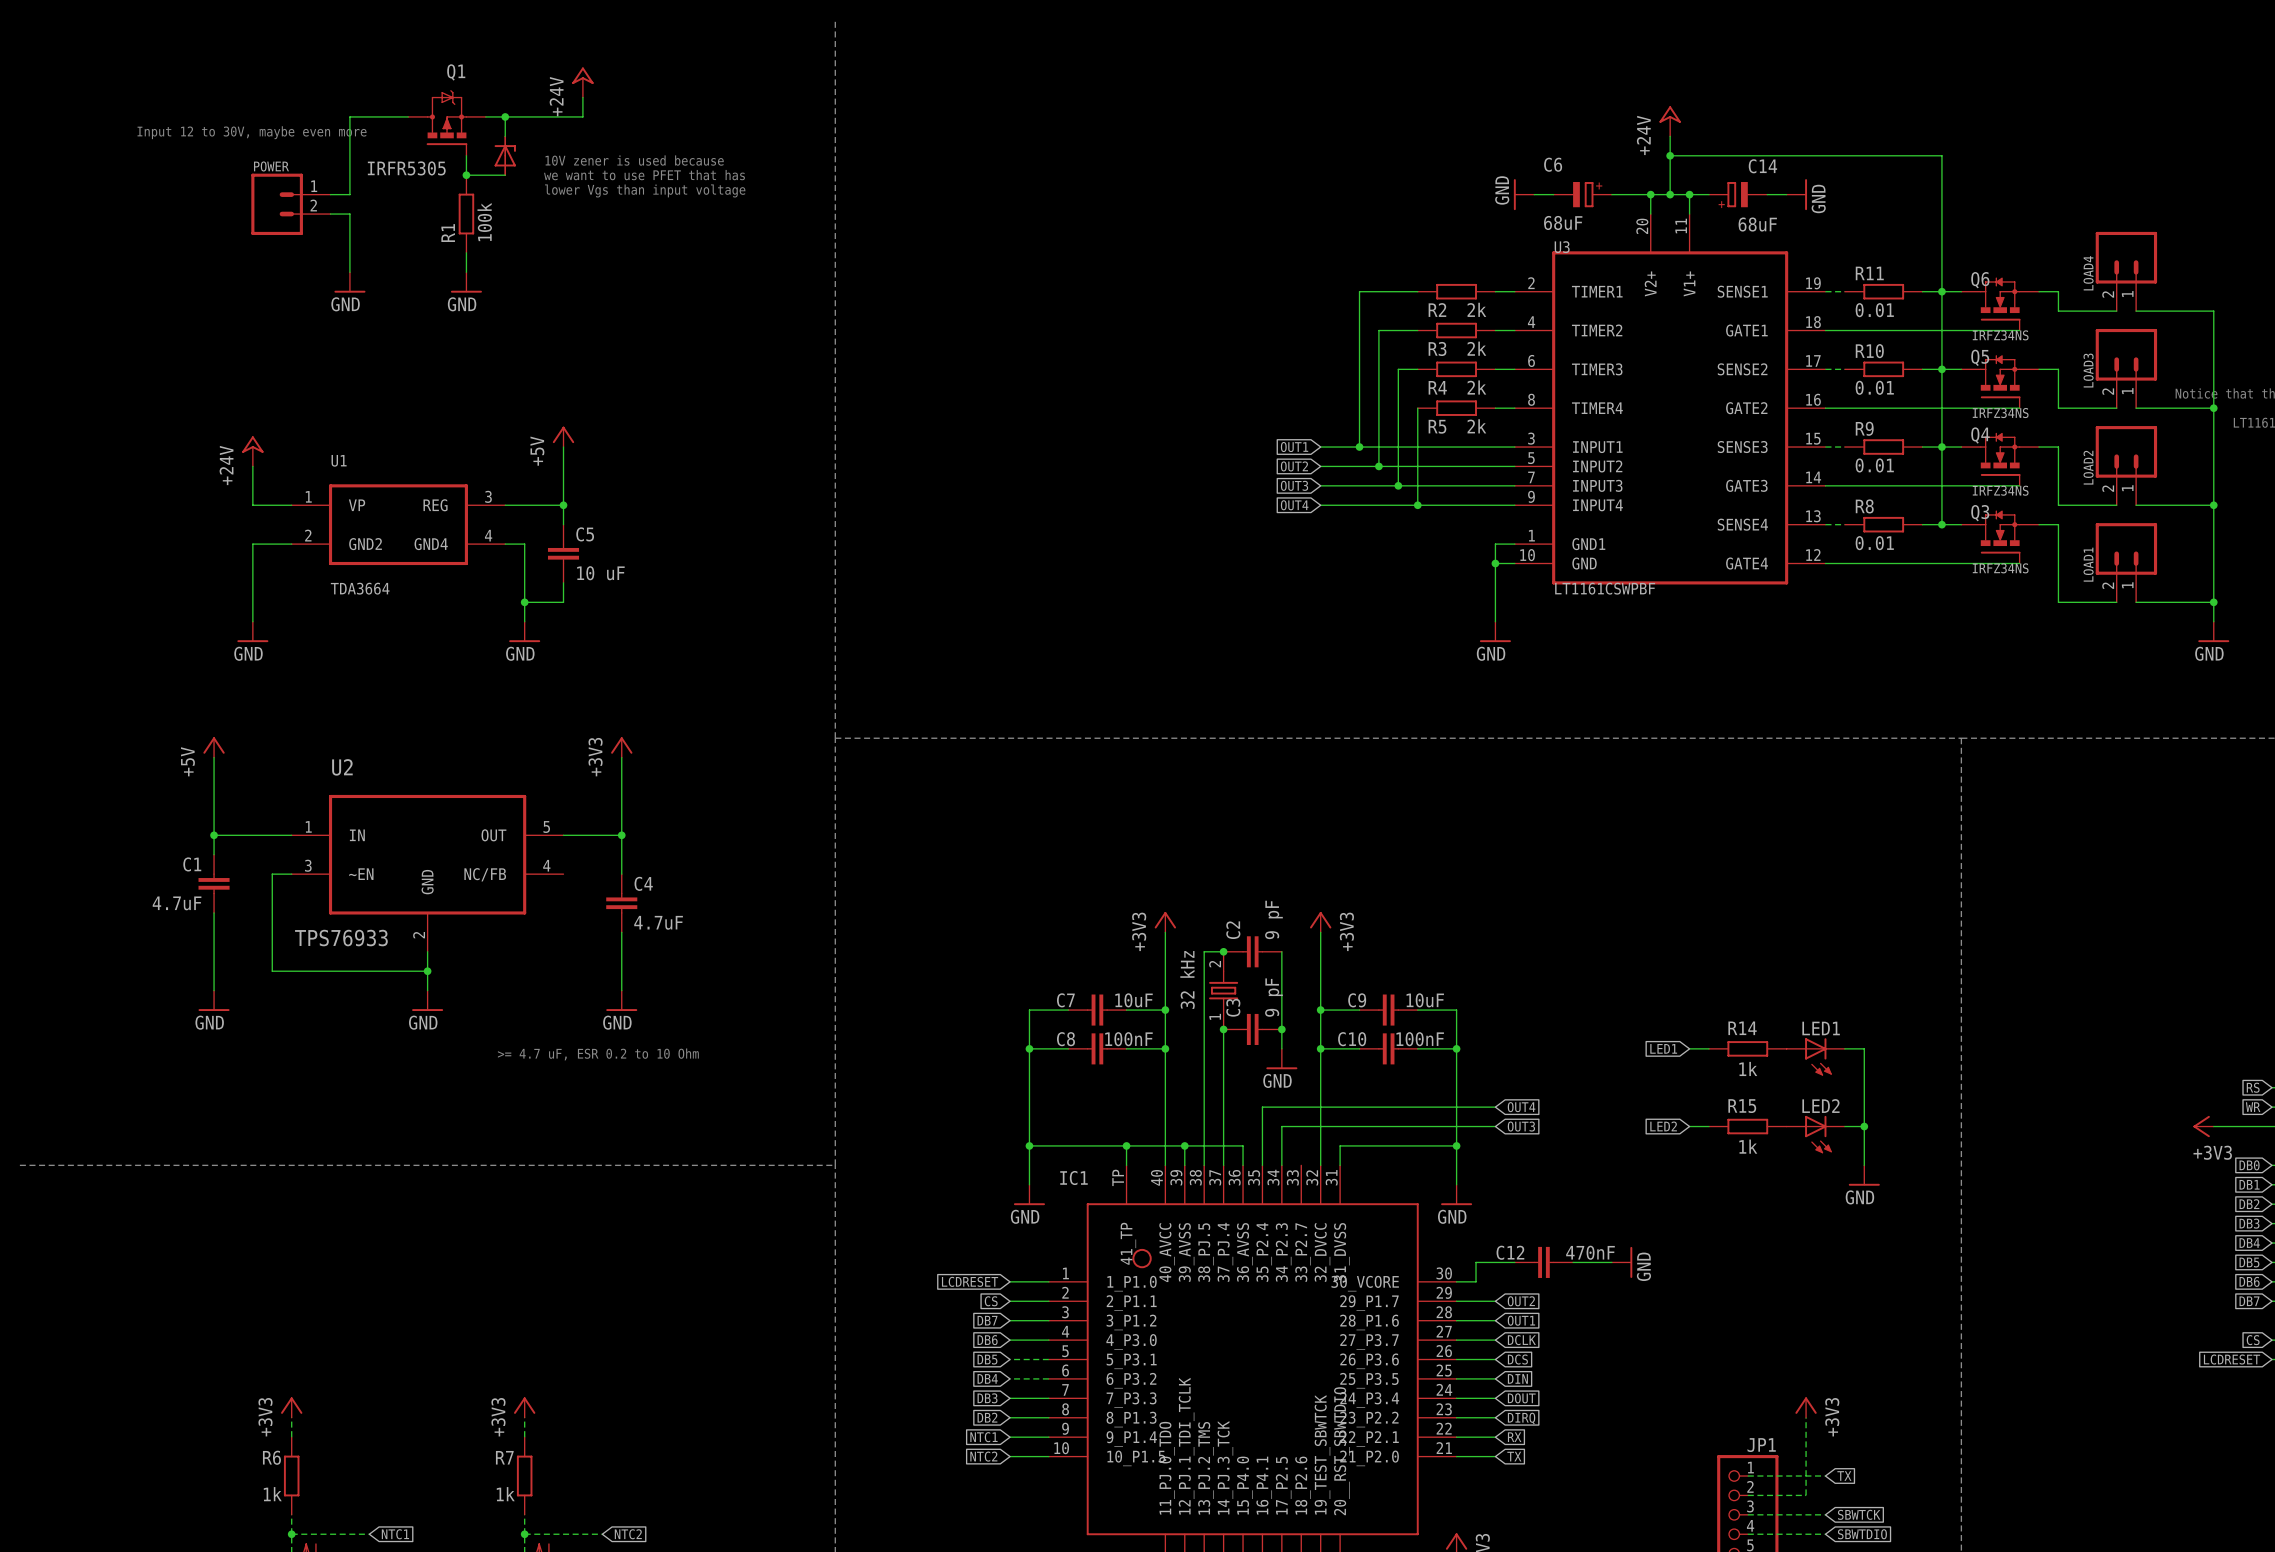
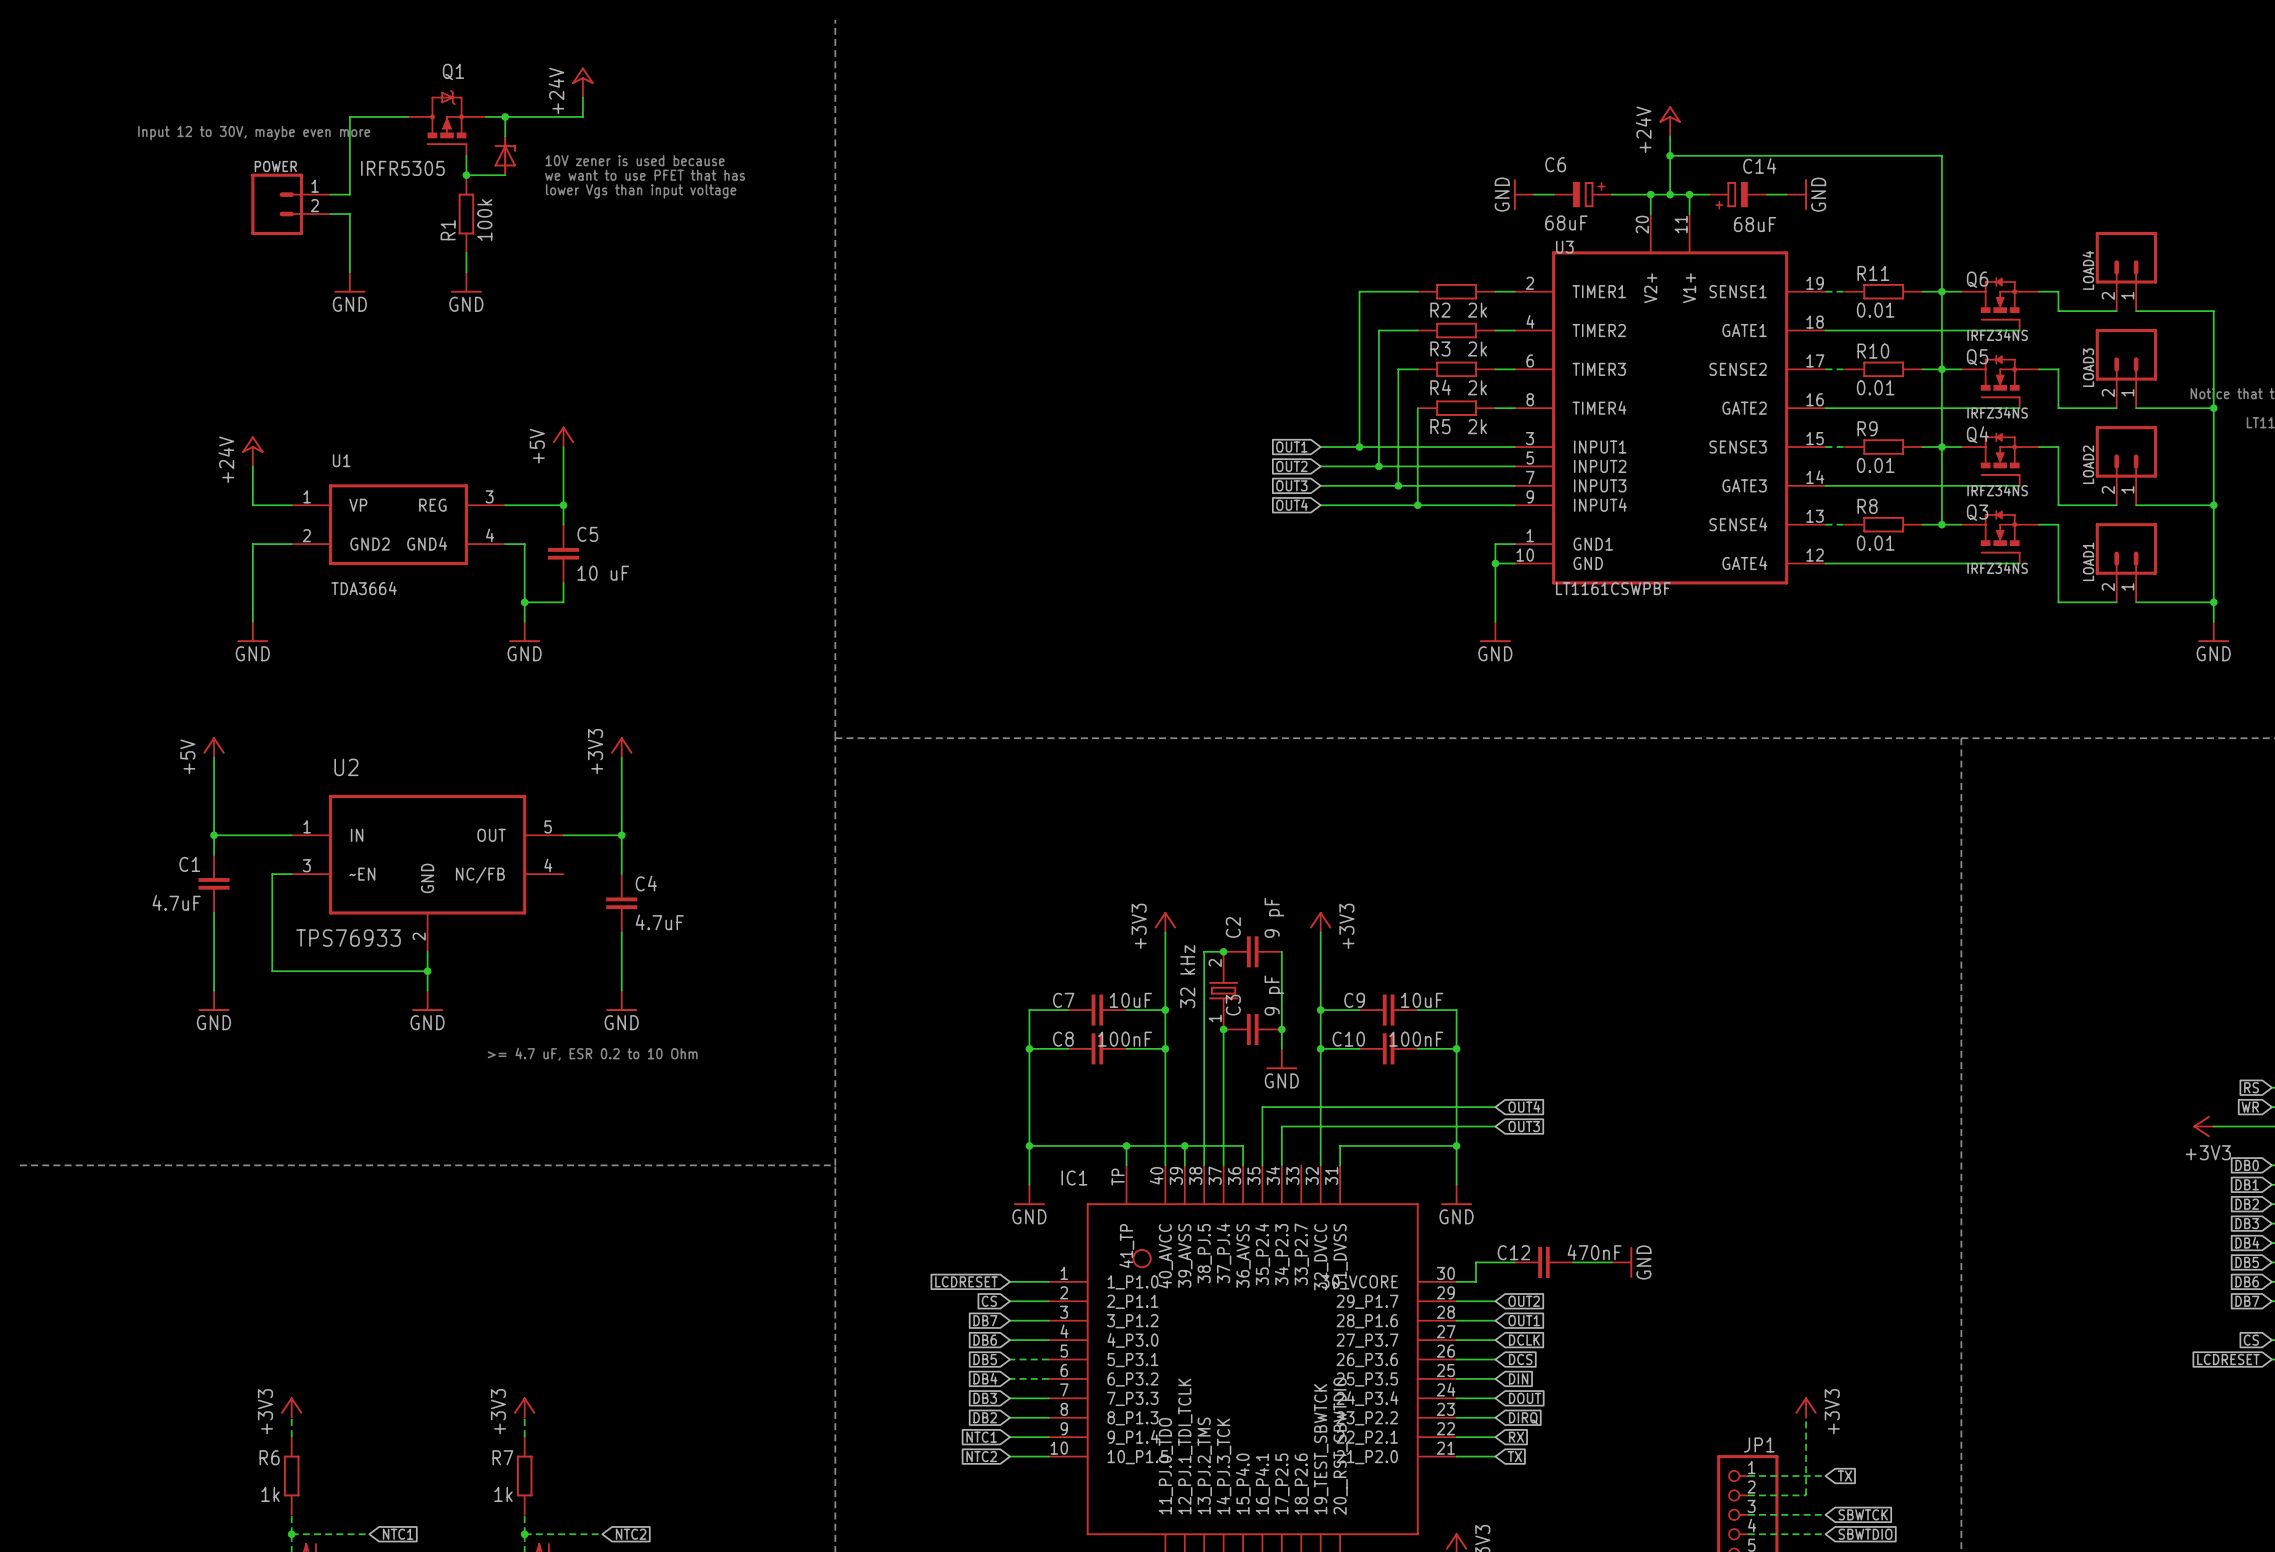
global label: LED1 (1663, 1048) -> none
wire: (1689, 1048) (1708, 1048) -> none
R14: 1k (1747, 1048) -> none
wire: (1844, 1048) (1864, 1048) (1864, 1165) -> none
LED1: (1815, 1056) -> none
global label: LED2 (1663, 1126) -> none
wire: (1689, 1126) (1708, 1126) -> none
R15: 1k (1747, 1126) -> none
wire: (1844, 1126) (1864, 1126) -> none
junction: (1864, 1126) -> none
LED2: (1815, 1134) -> none
power symbol: GND (1864, 1175) -> none

